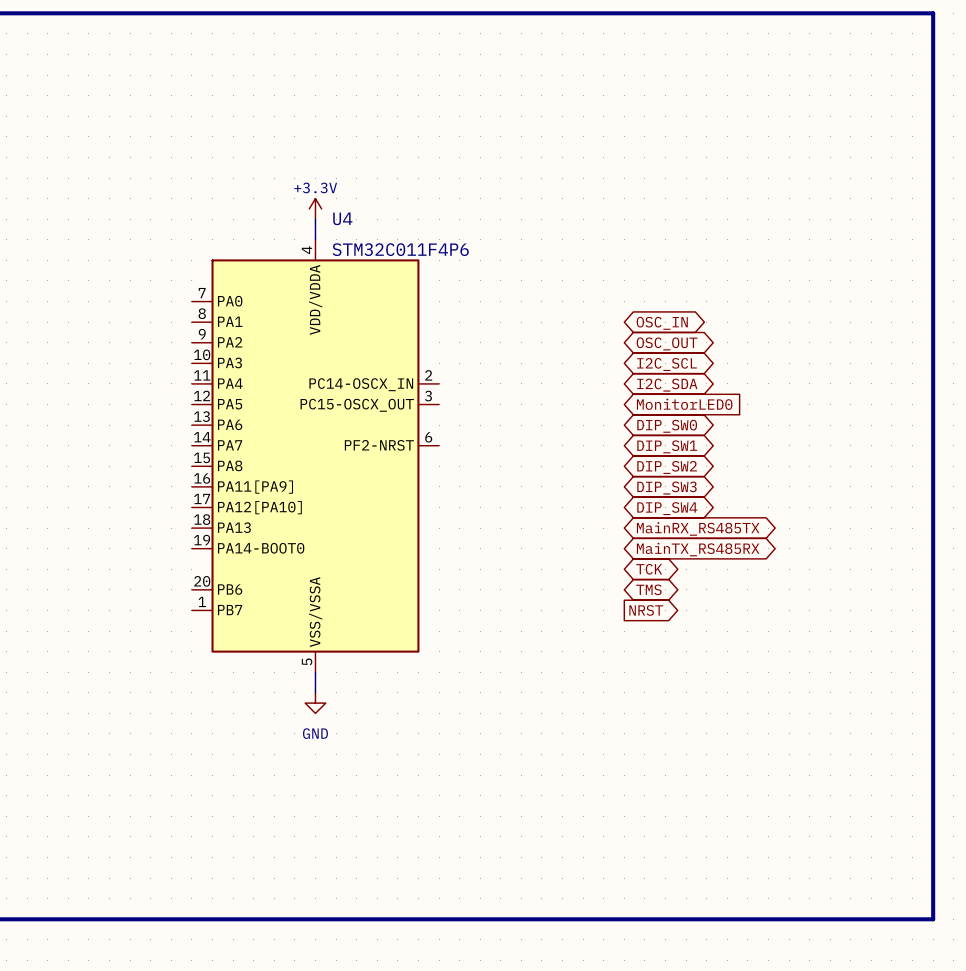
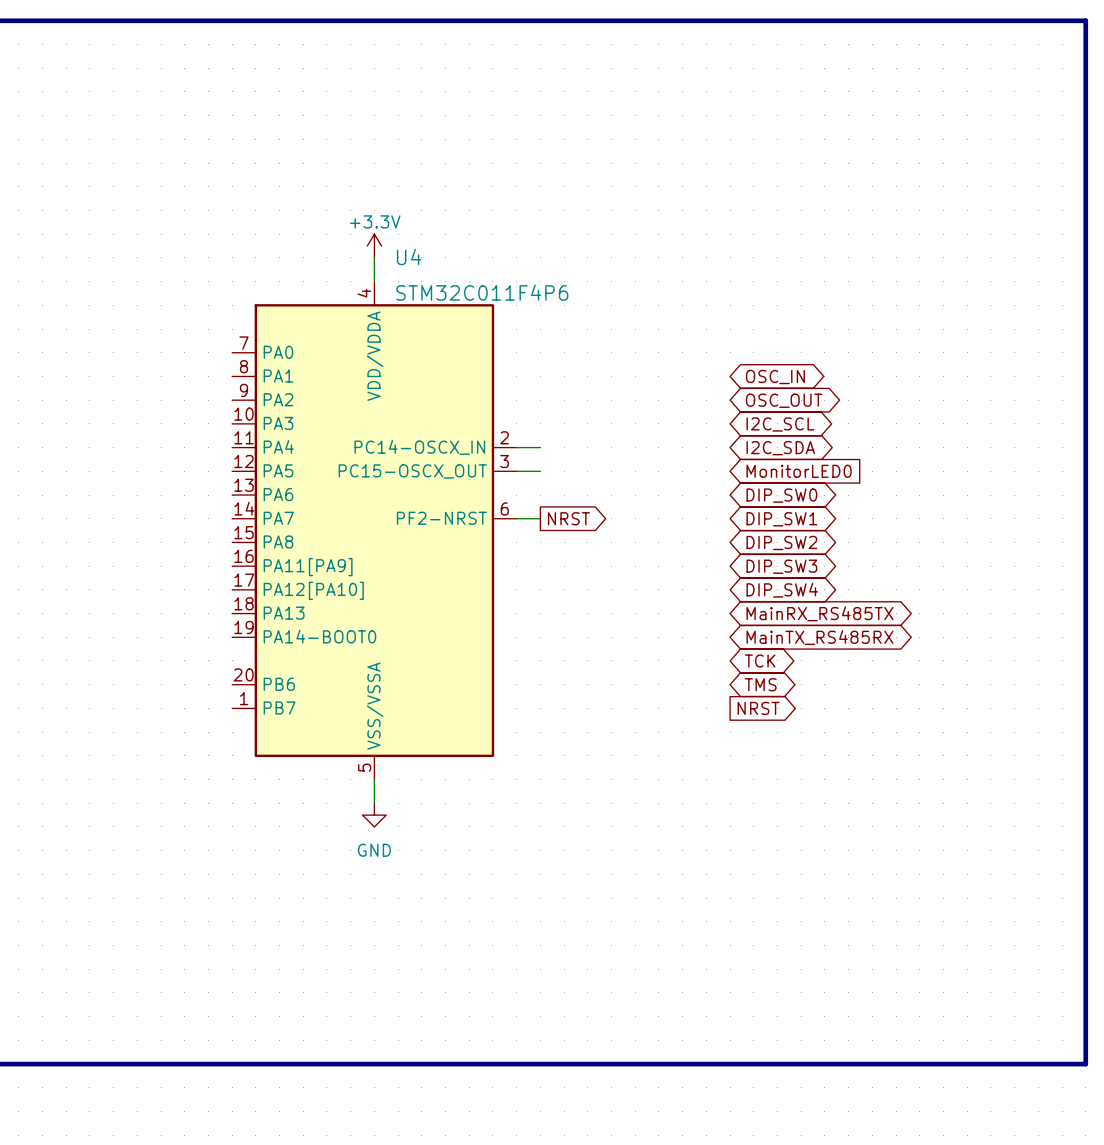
wire: none -> (516, 447) (540, 447)
wire: none -> (516, 471) (540, 471)
wire: none -> (516, 518) (540, 518)
global label: none -> NRST (568, 518)

